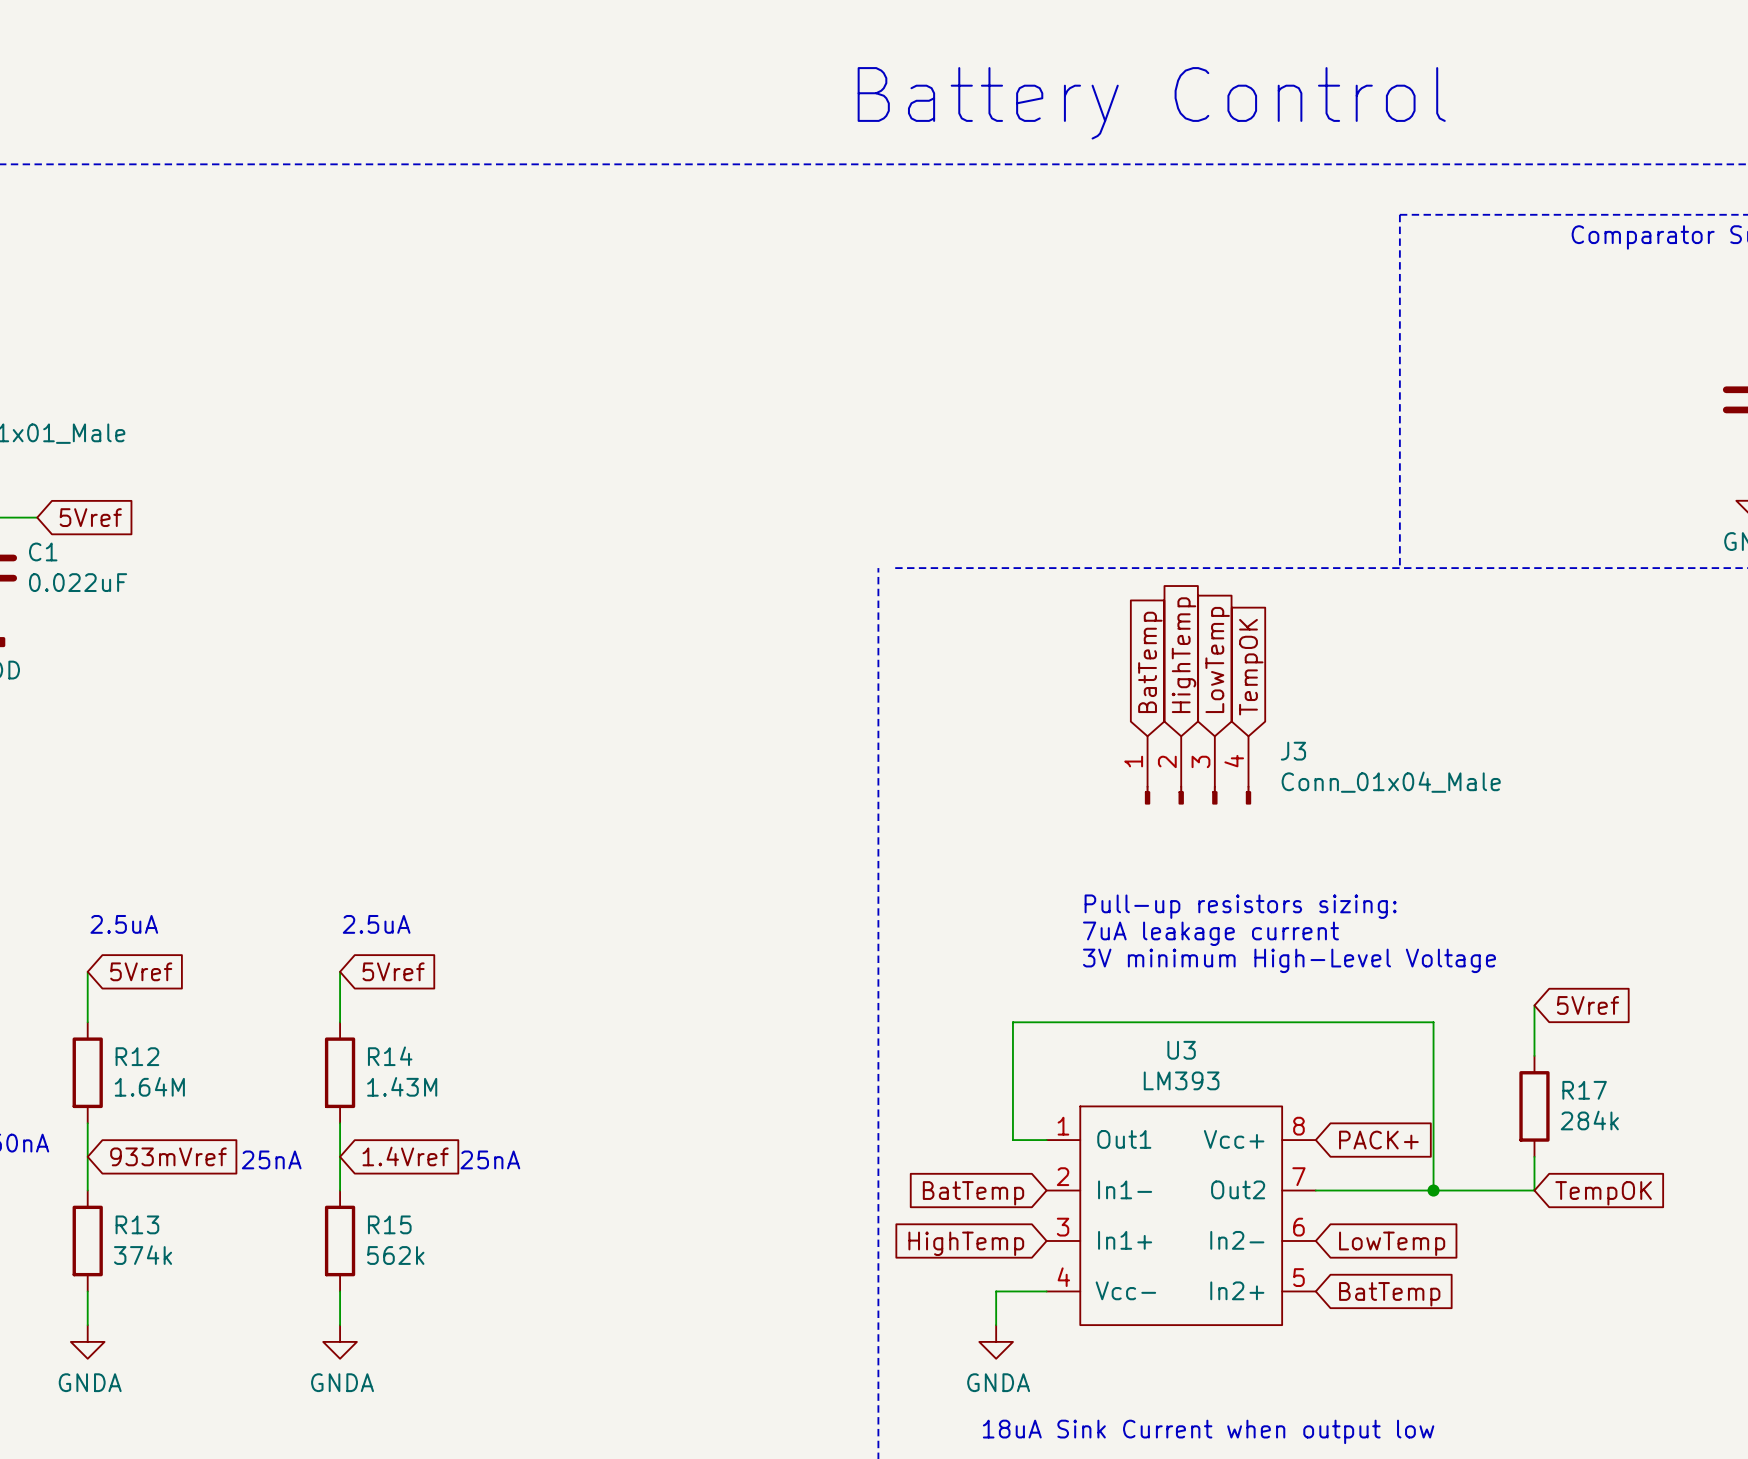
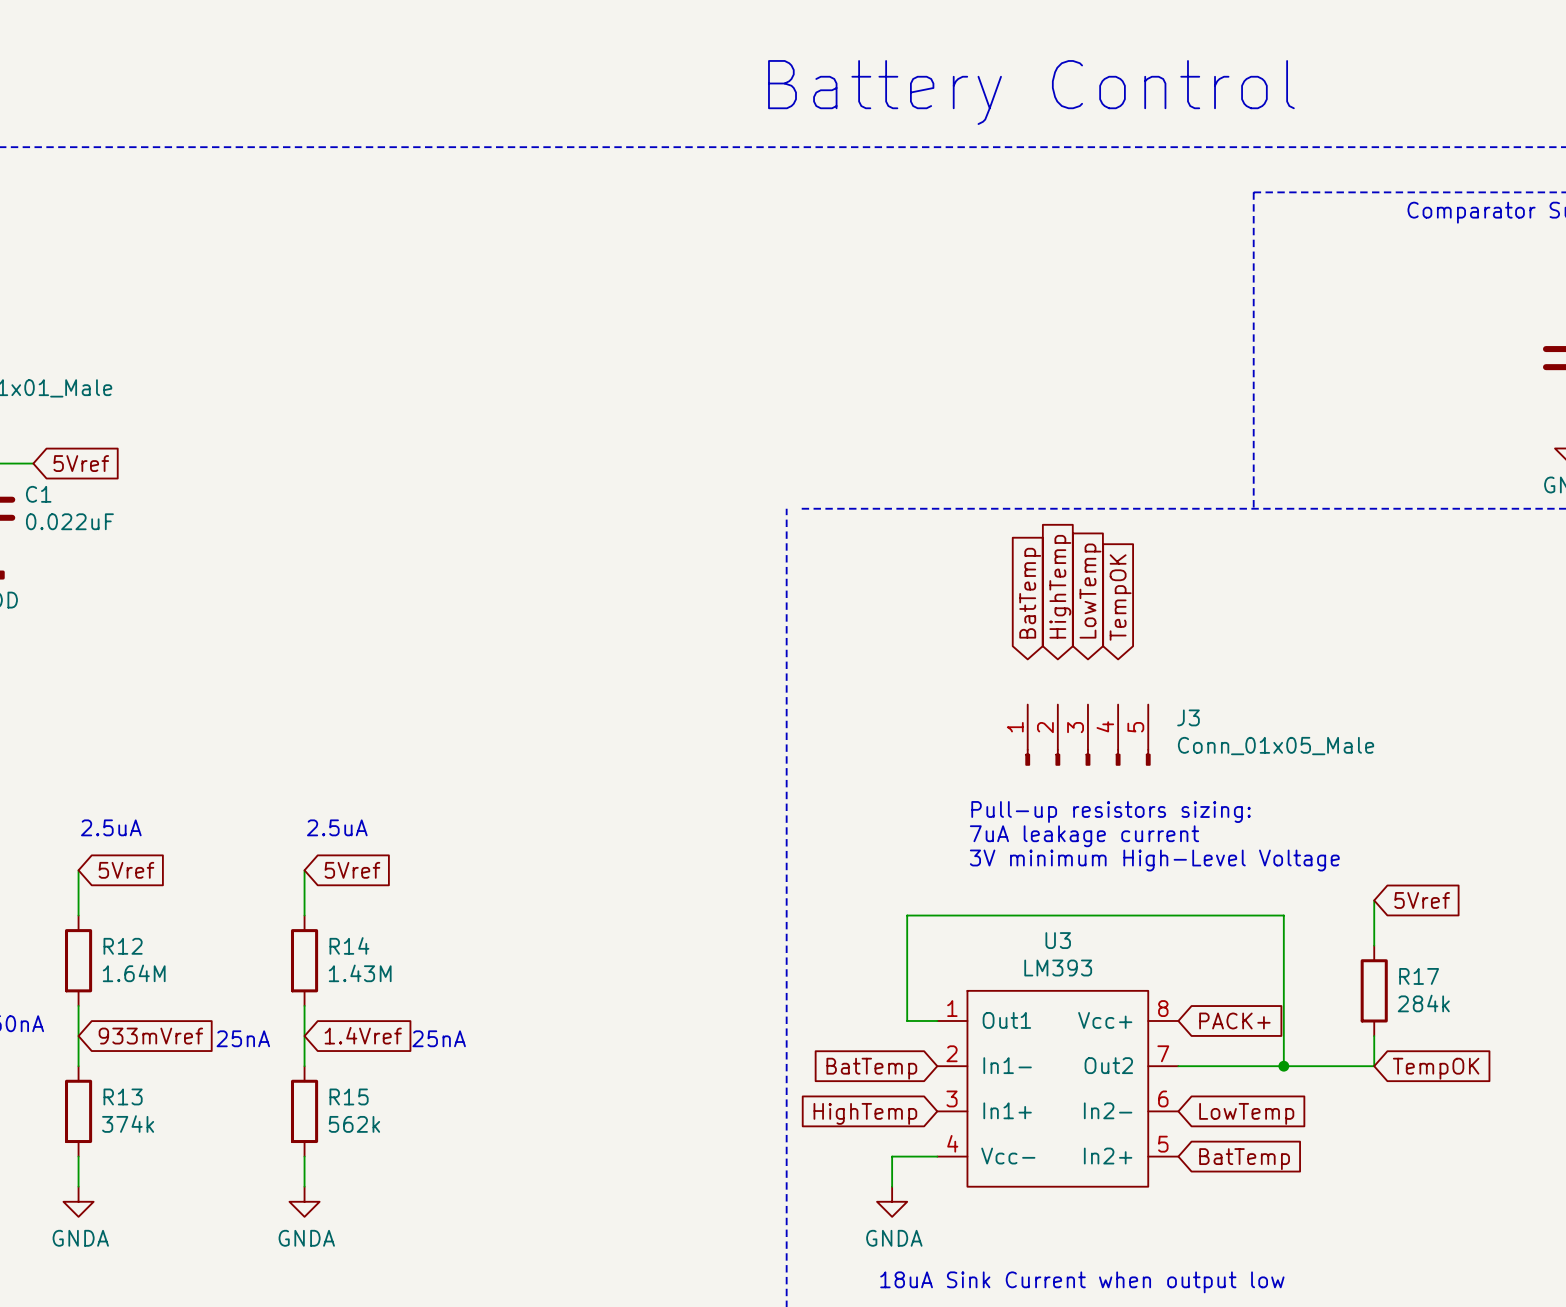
J3 symbol: [1144, 736, 1252, 805] -> [1025, 704, 1151, 766]
J3 value: Conn_01x04_Male (1391, 782) -> Conn_01x05_Male (1276, 746)

